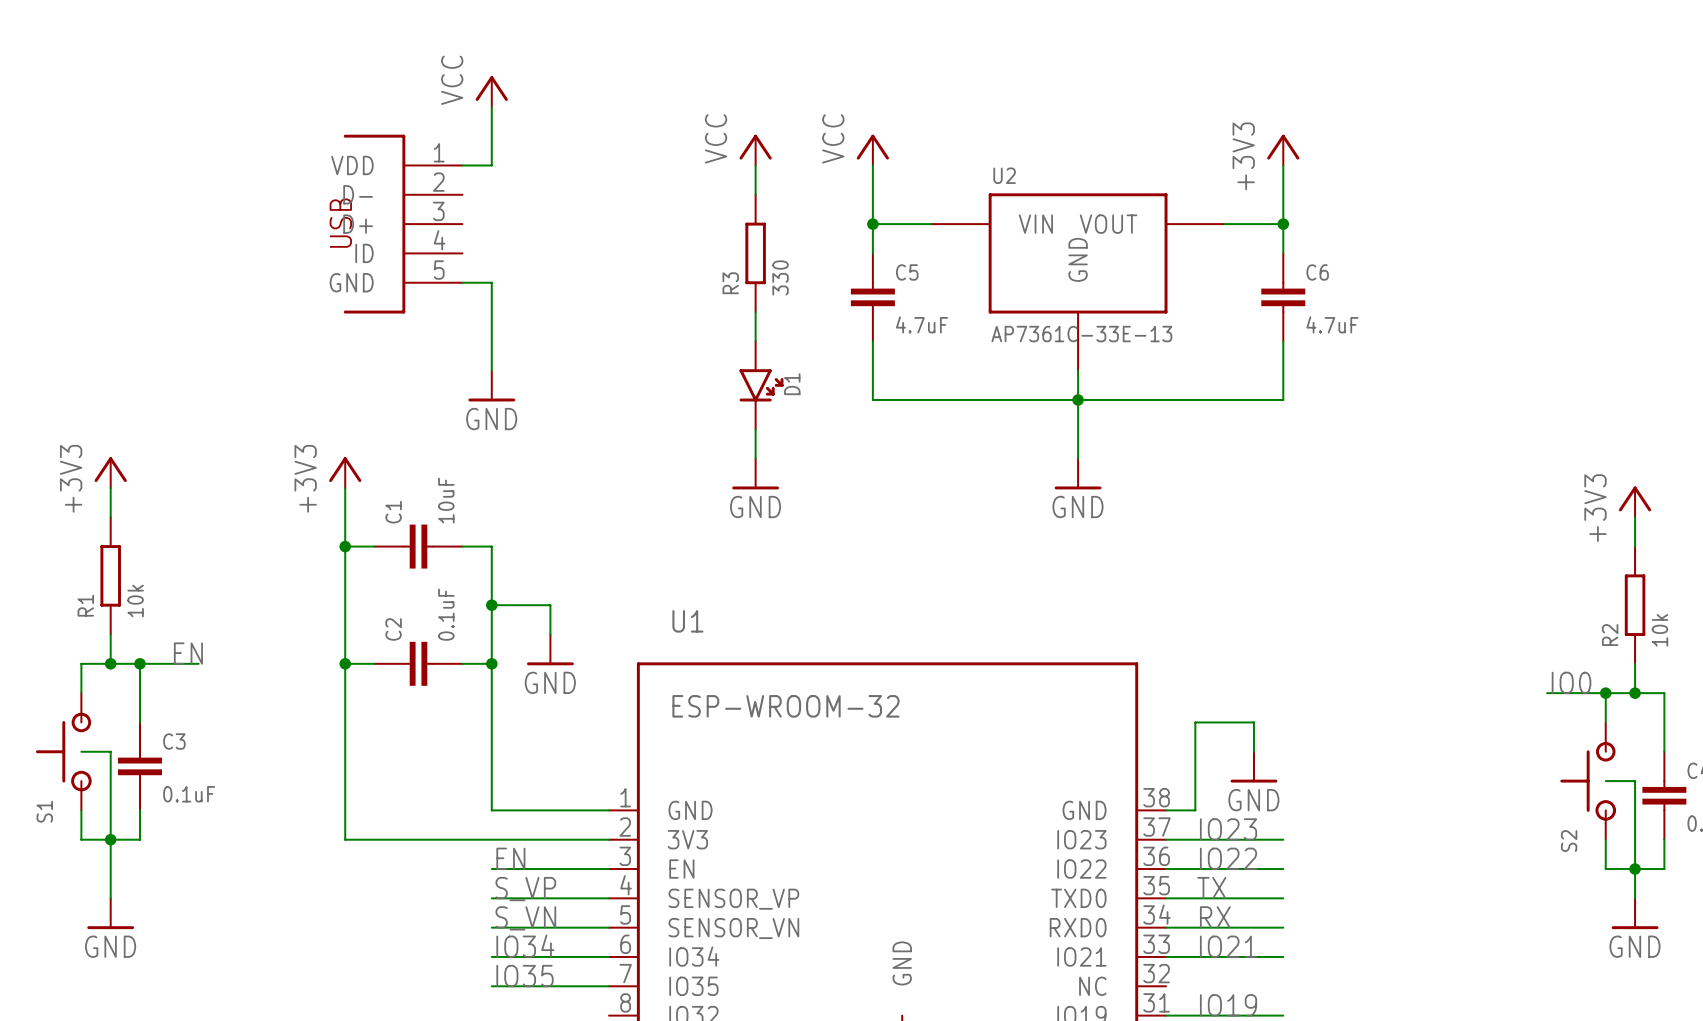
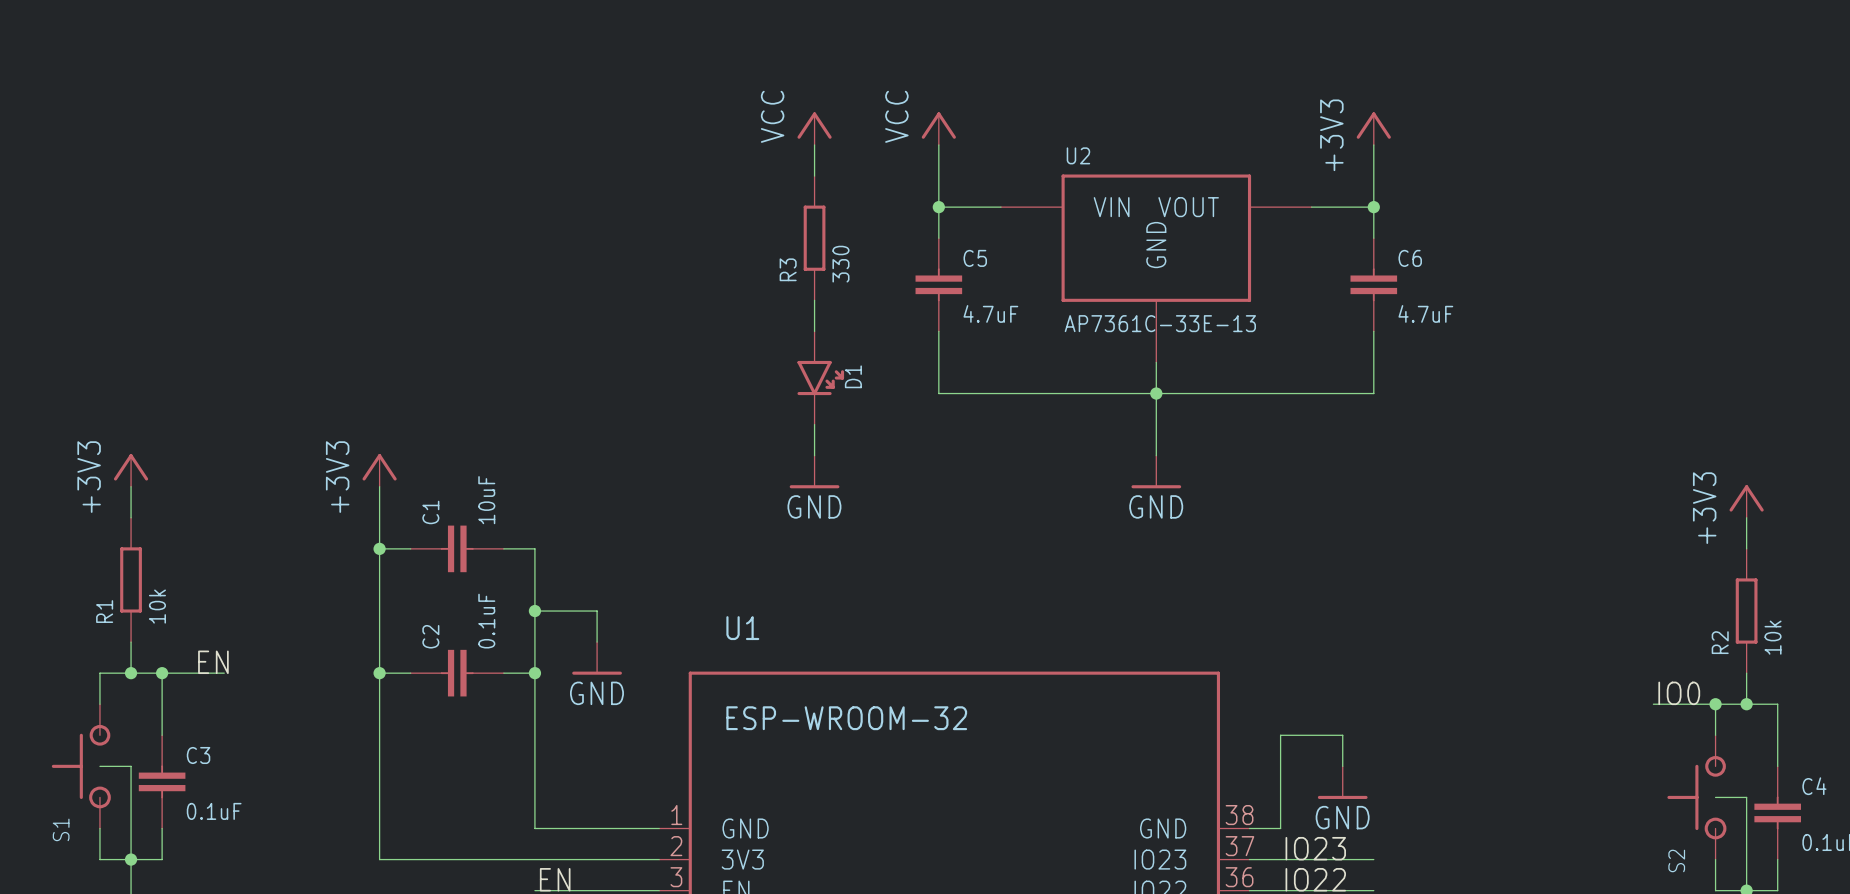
power symbol: VCC (491, 91) -> none
wire: (491, 106) (491, 165) (462, 165) -> none
part: (403, 224) -> none
wire: (462, 282) (491, 282) (491, 370) -> none
power symbol: GND (491, 386) -> none

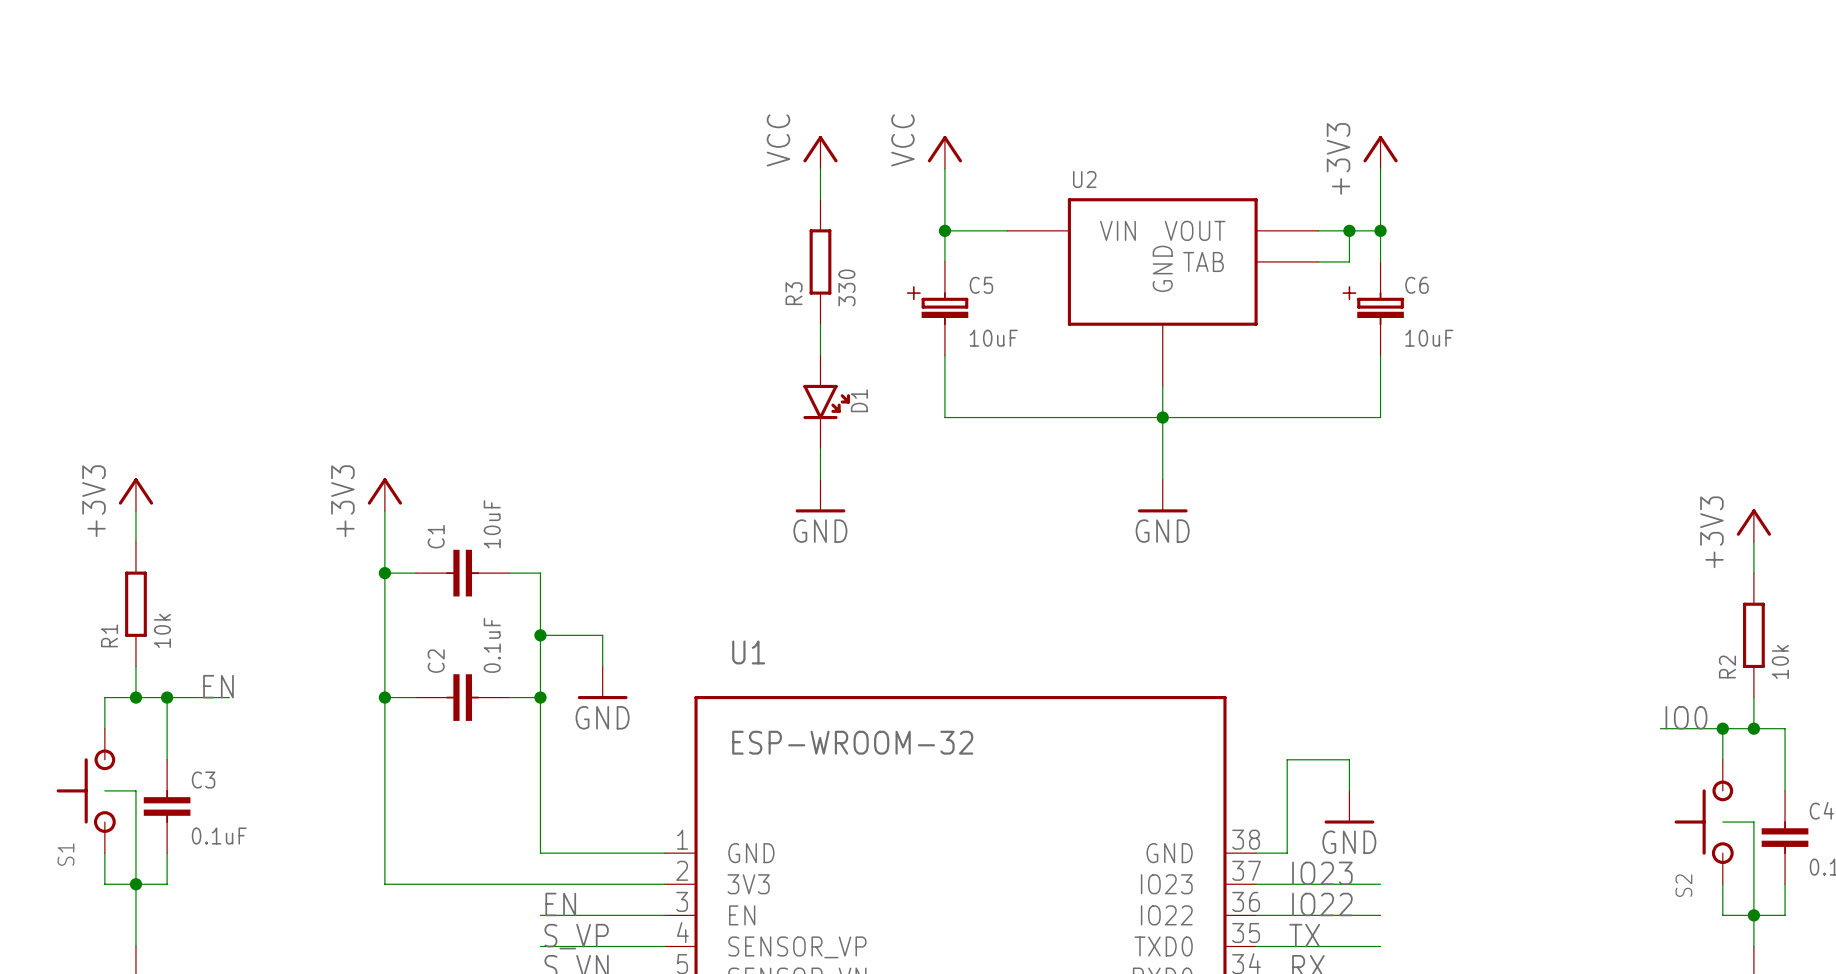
U2 symbol: [1000, 174, 1312, 363] -> [1007, 198, 1319, 387]
wire: none -> (1349, 230) (1349, 261) (1318, 261)
junction: none -> (1349, 230)
C5 symbol: [915, 238, 963, 332] -> [906, 261, 969, 356]
C6 symbol: [1350, 238, 1398, 332] -> [1342, 261, 1404, 356]
C5 value: 4.7uF (990, 313) -> 10uF (993, 338)
C6 value: 4.7uF (1425, 313) -> 10uF (1429, 338)
U2 value: AP7361C-33E-13 (1160, 323) -> none

